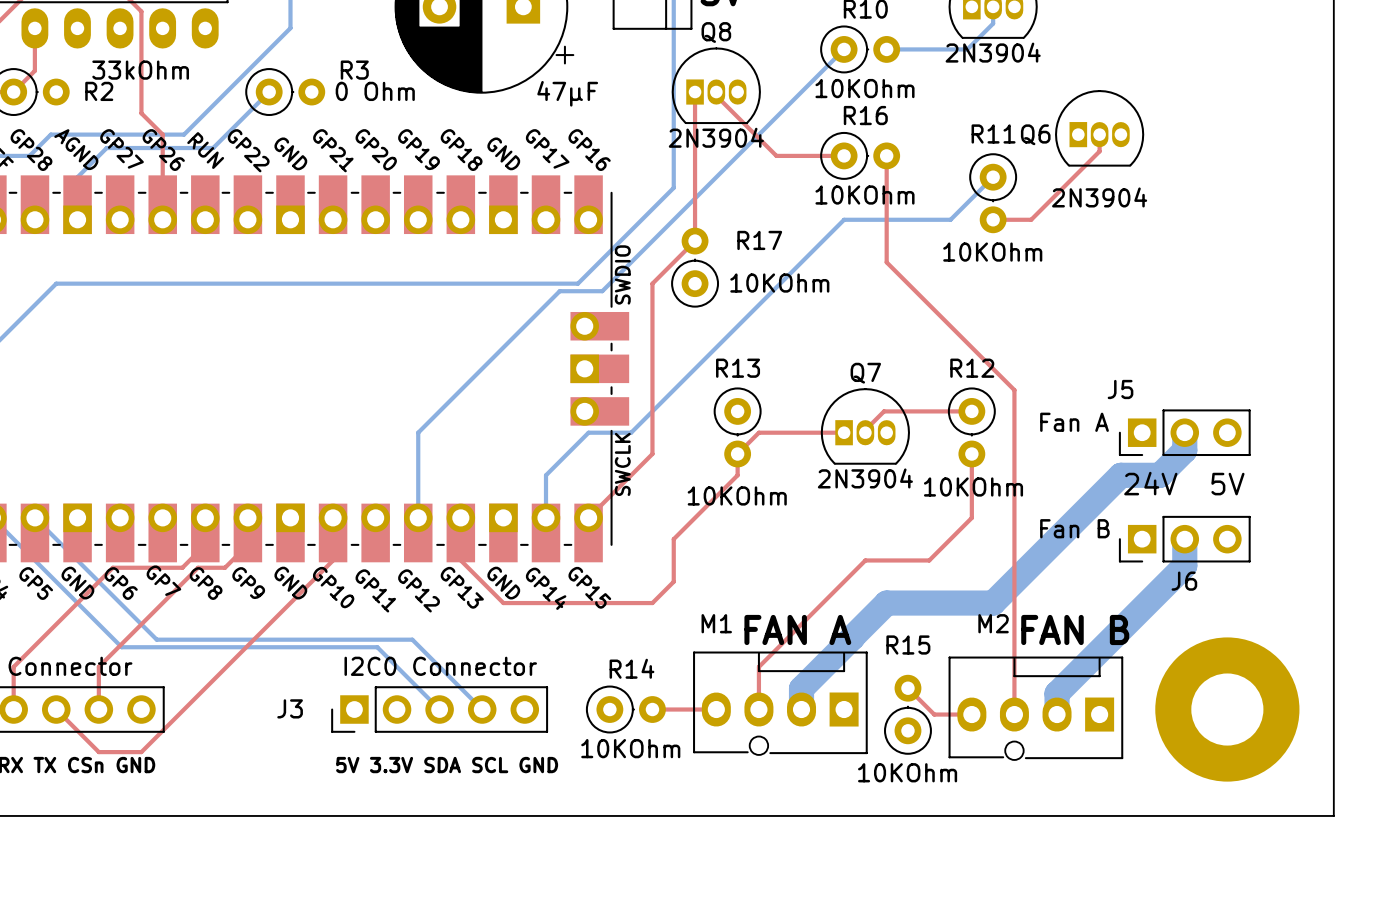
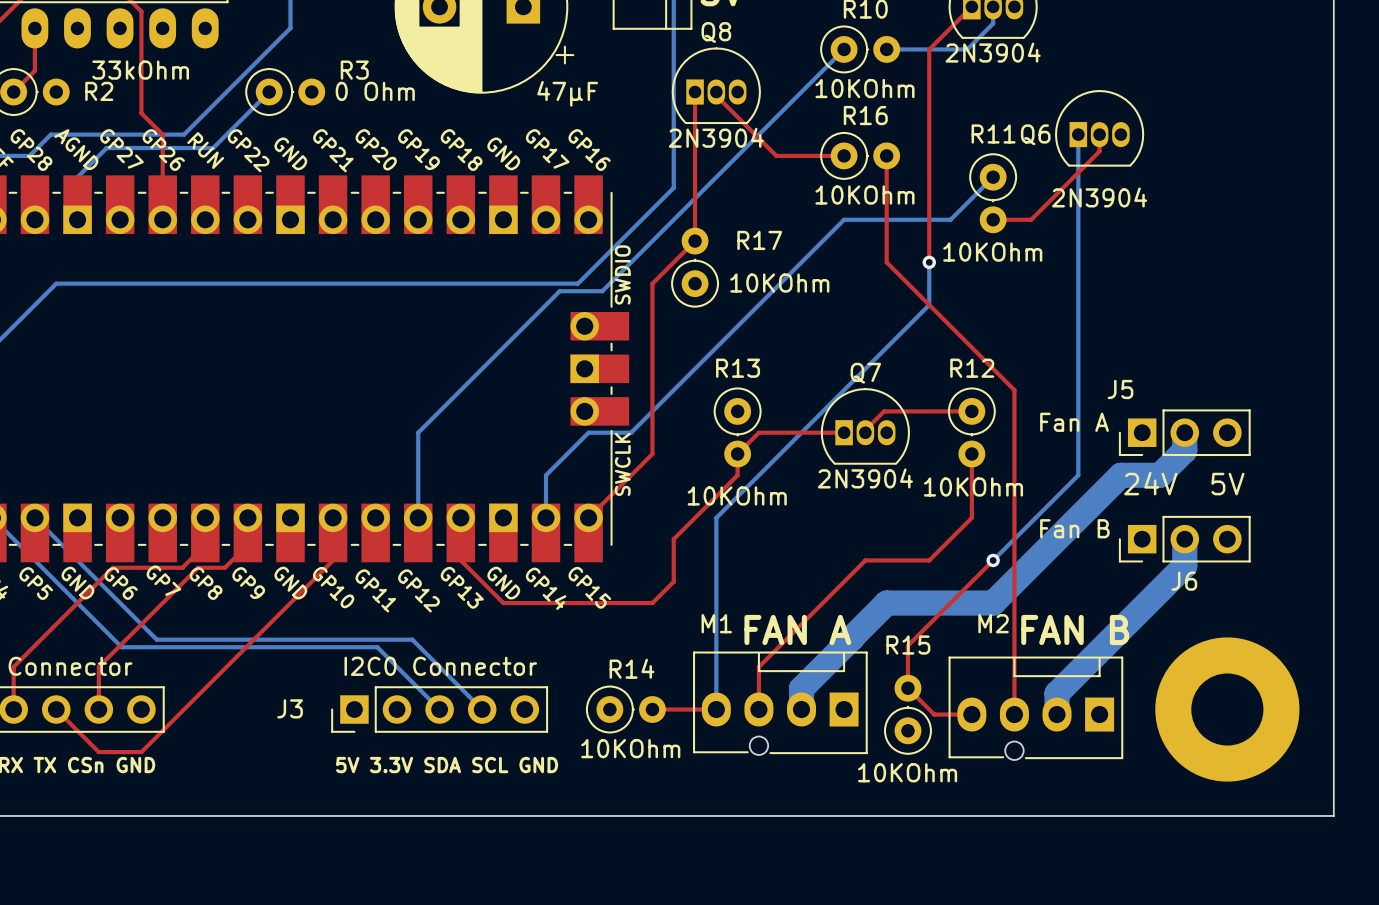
top track: none -> (971, 6) (929, 49) (929, 262)
bottom track: none -> (1078, 134) (1078, 475) (993, 560)
bottom track: none -> (929, 262) (929, 304) (716, 517) (716, 709)
via: none -> (929, 262)
top track: none -> (993, 560) (907, 645) (907, 688)
via: none -> (993, 560)

